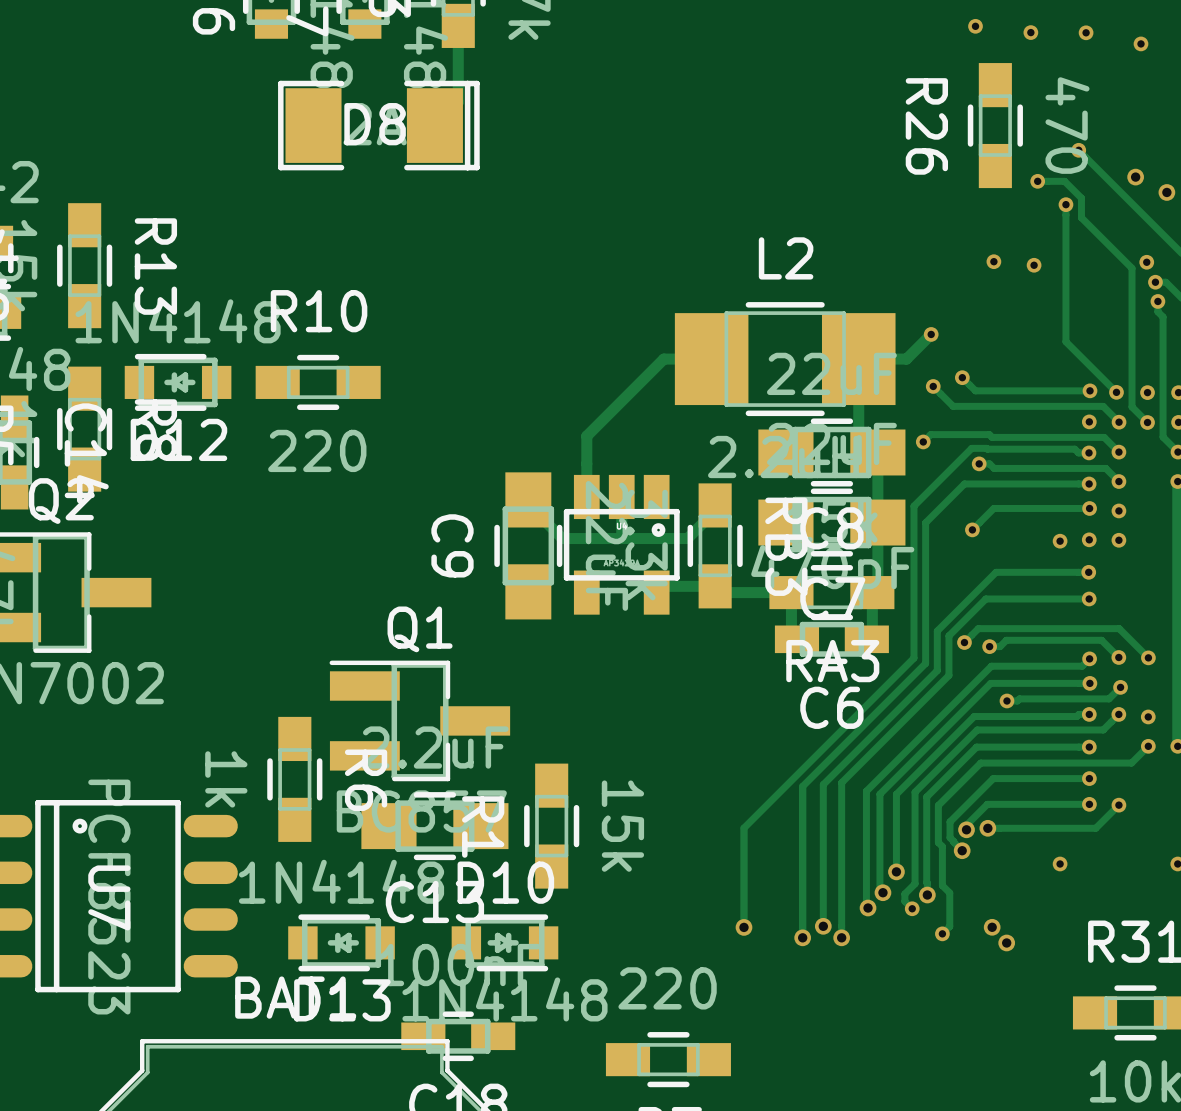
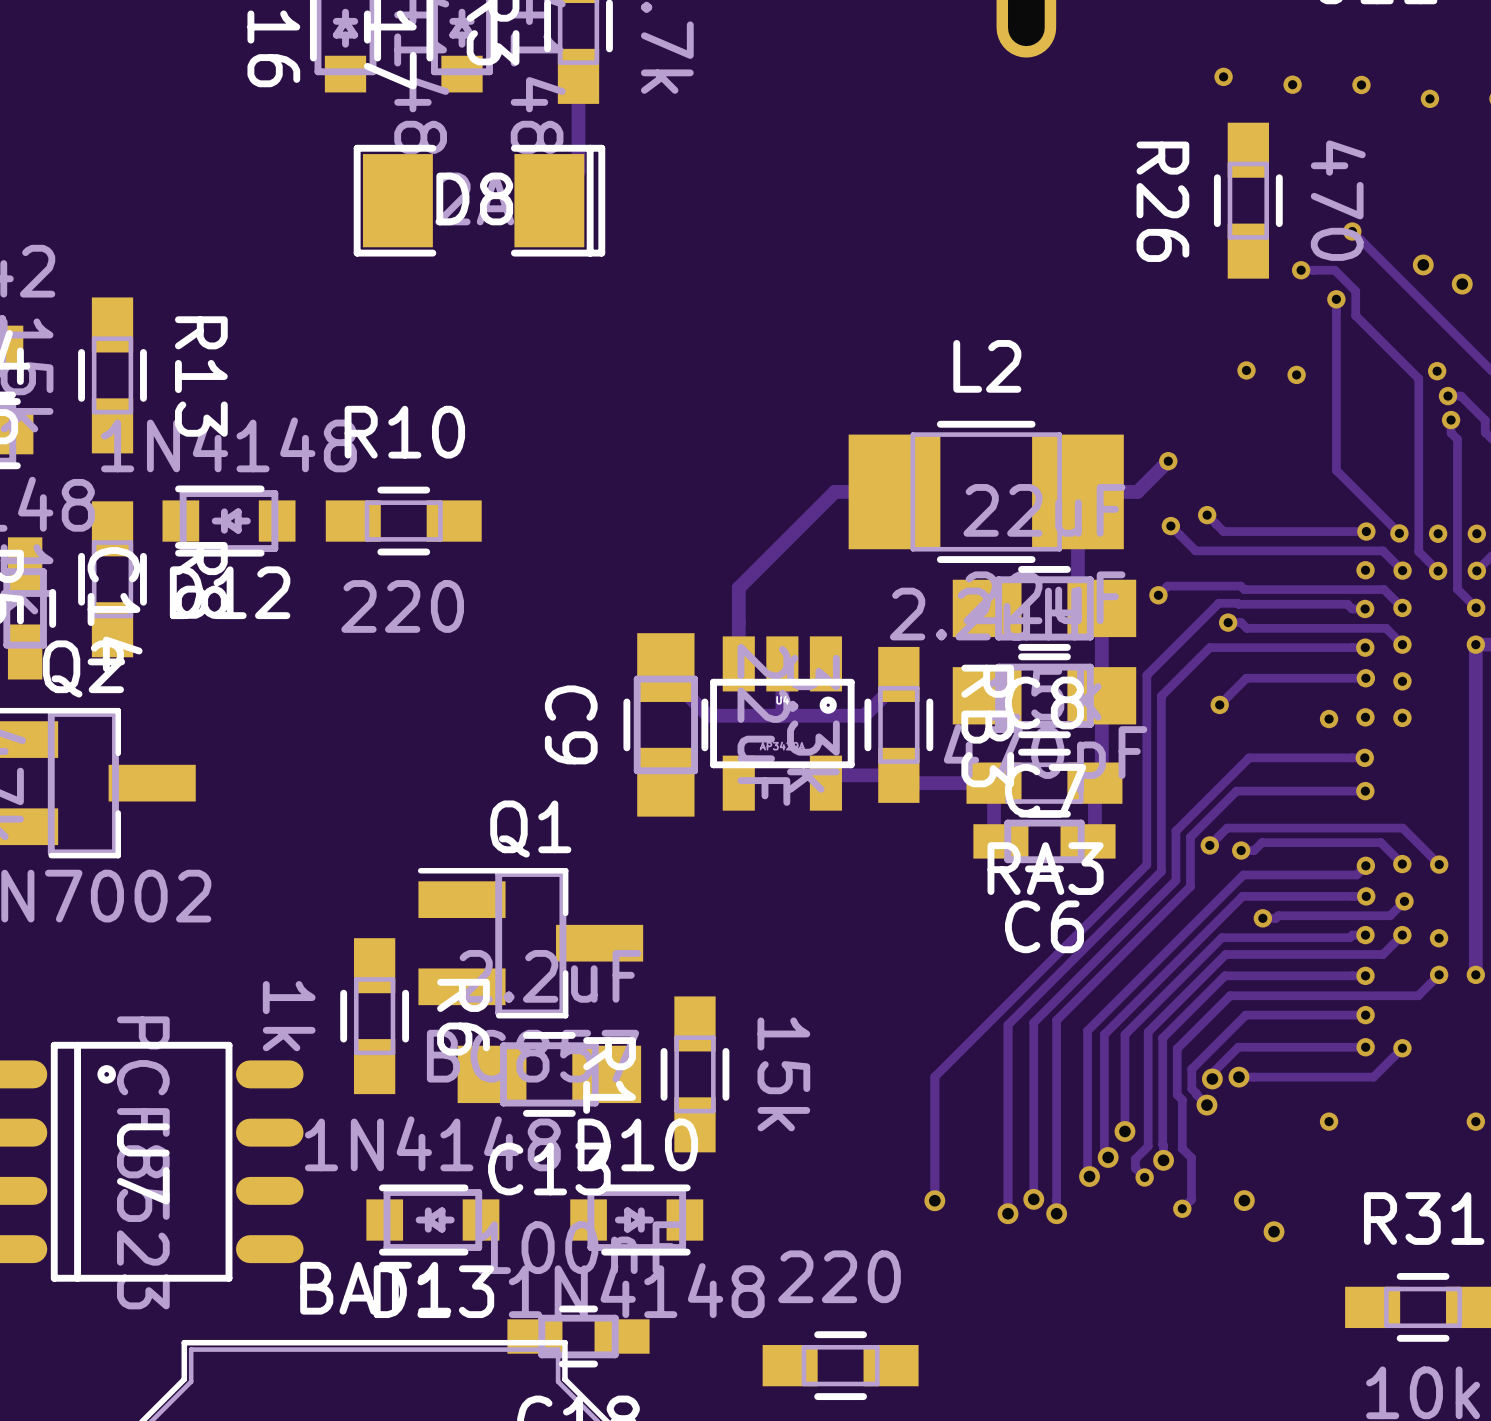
via position: (1006, 942) -> (1274, 1231)

